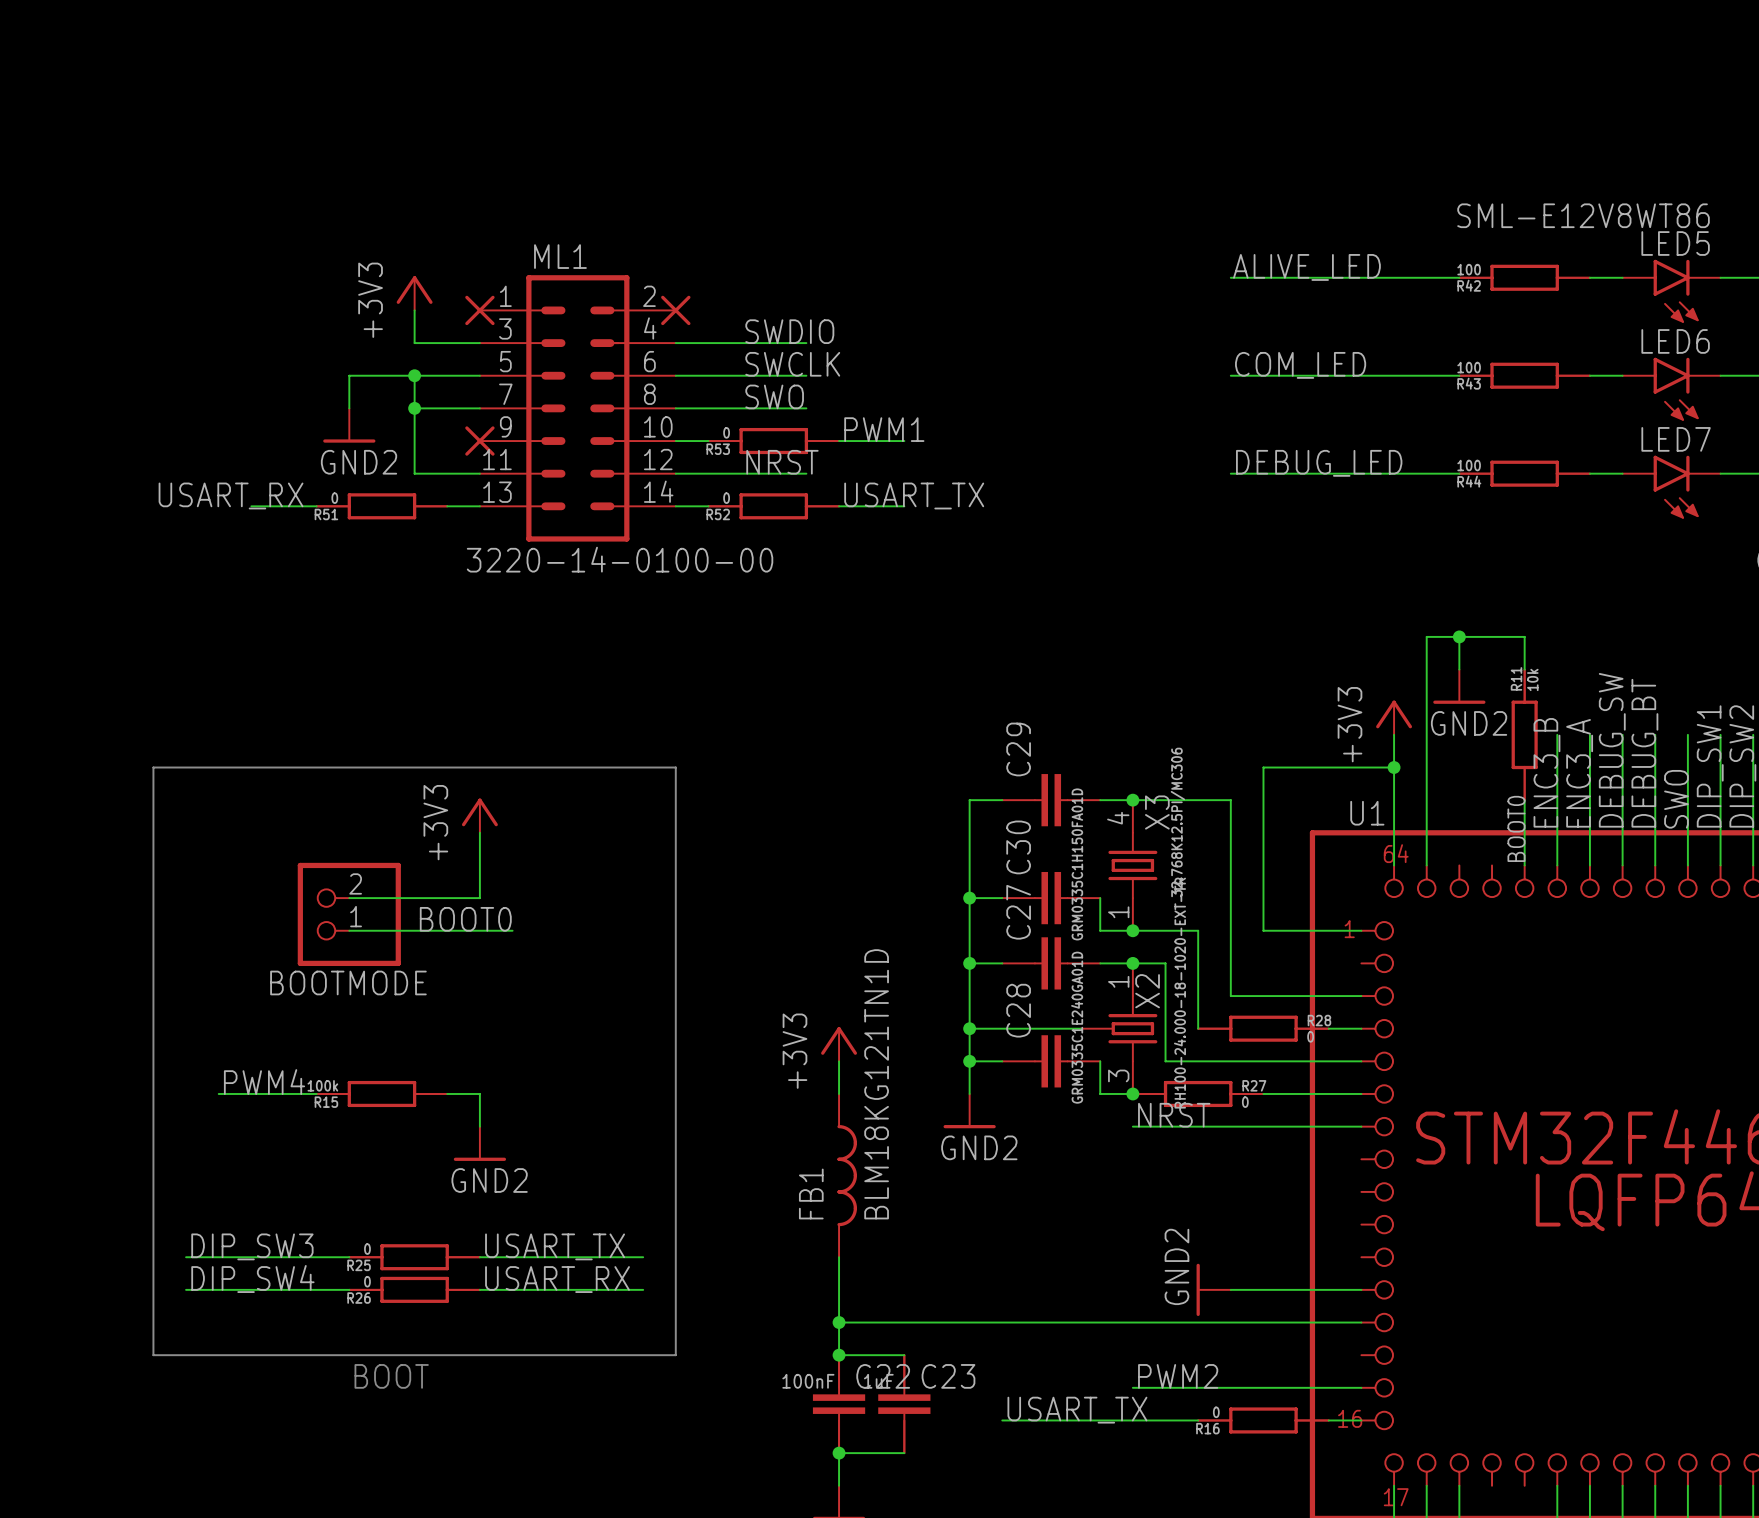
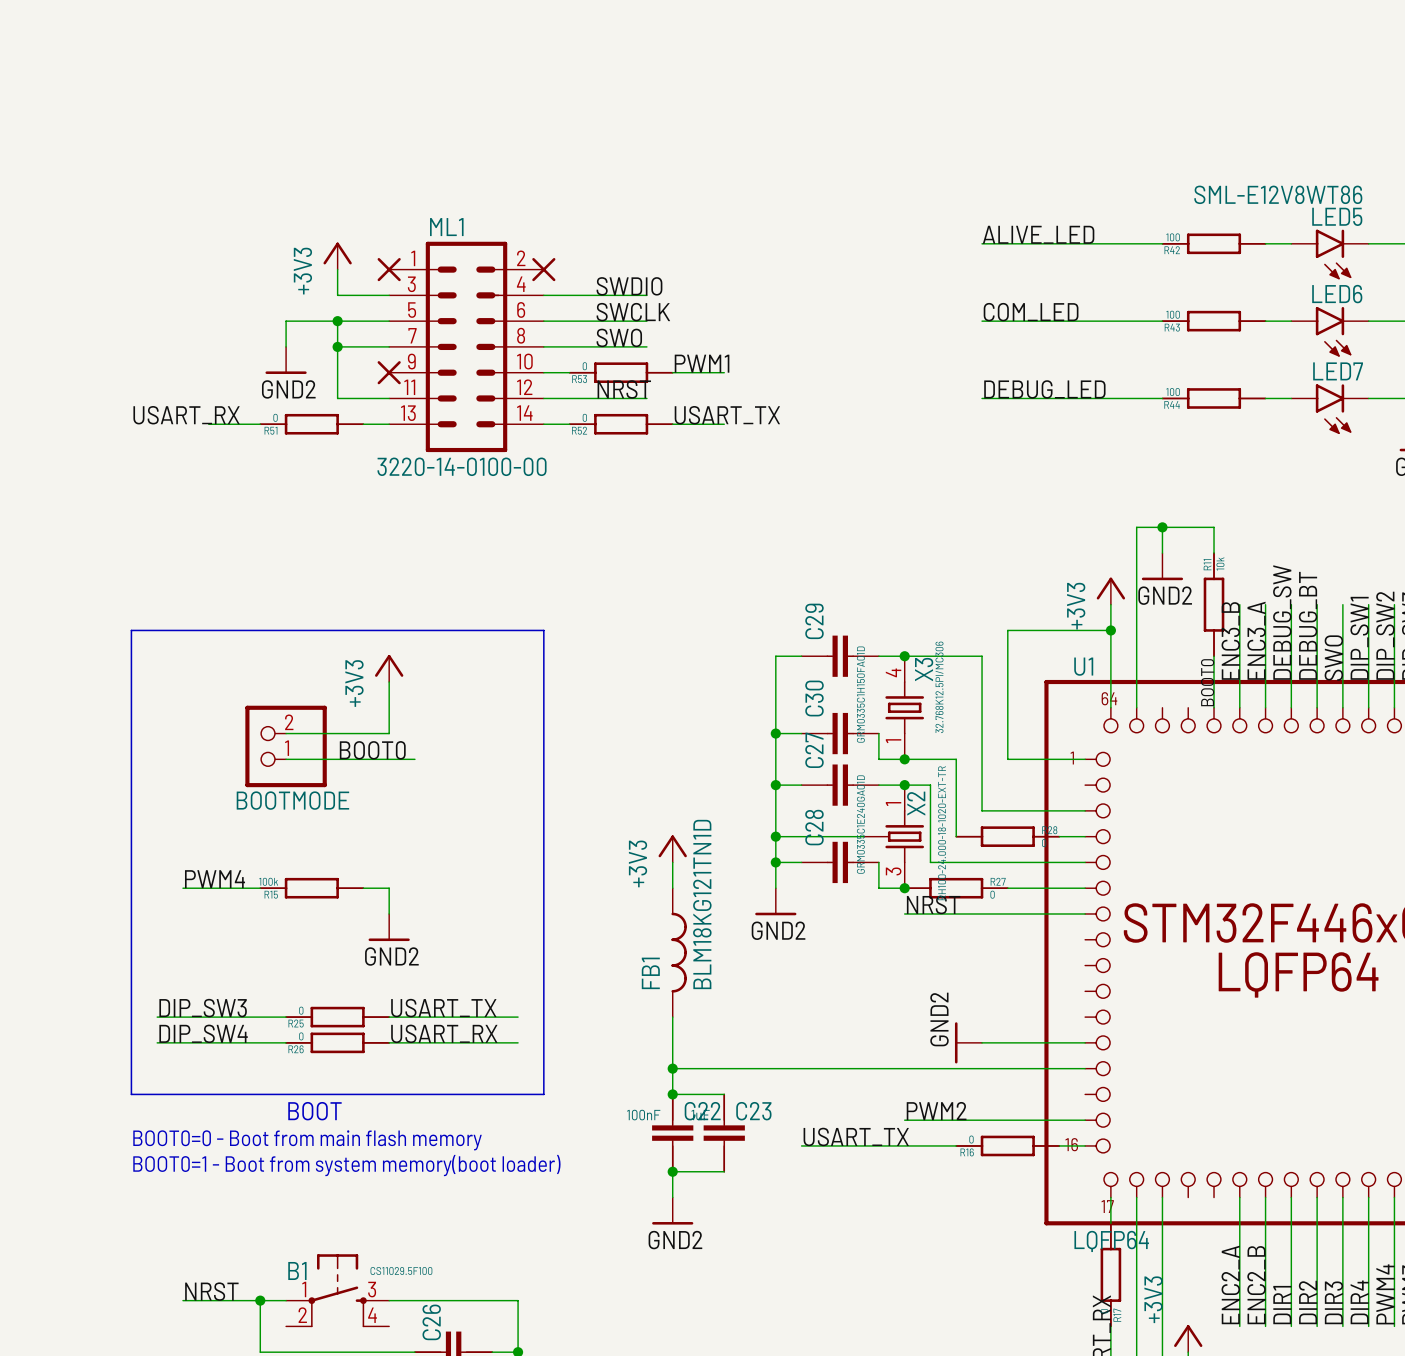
text: none -> BOOT0=0 - Boot from main flash memory (307, 1140)
text: none -> BOOT0=1 - Boot from system memory(boot loader) (346, 1165)

